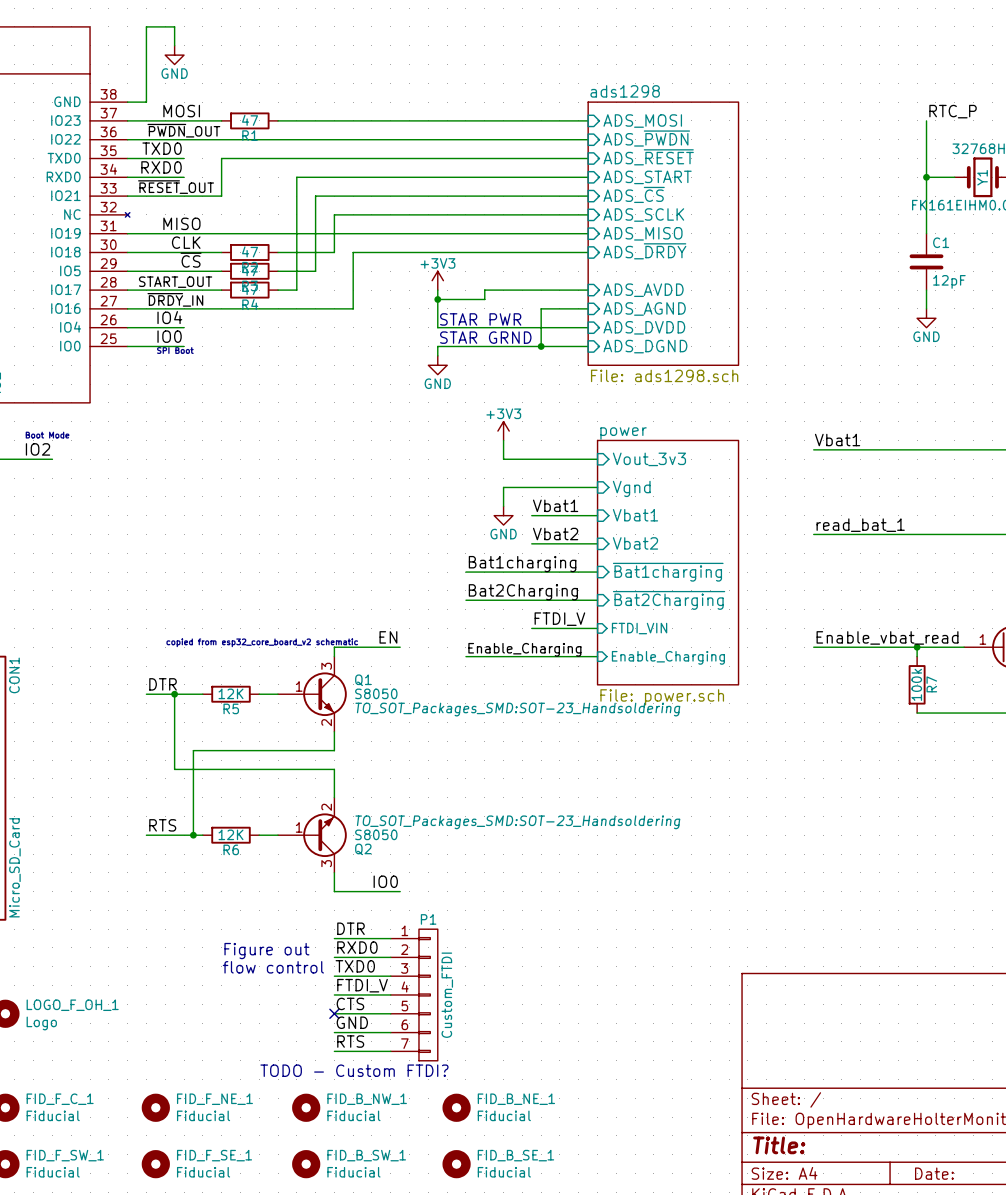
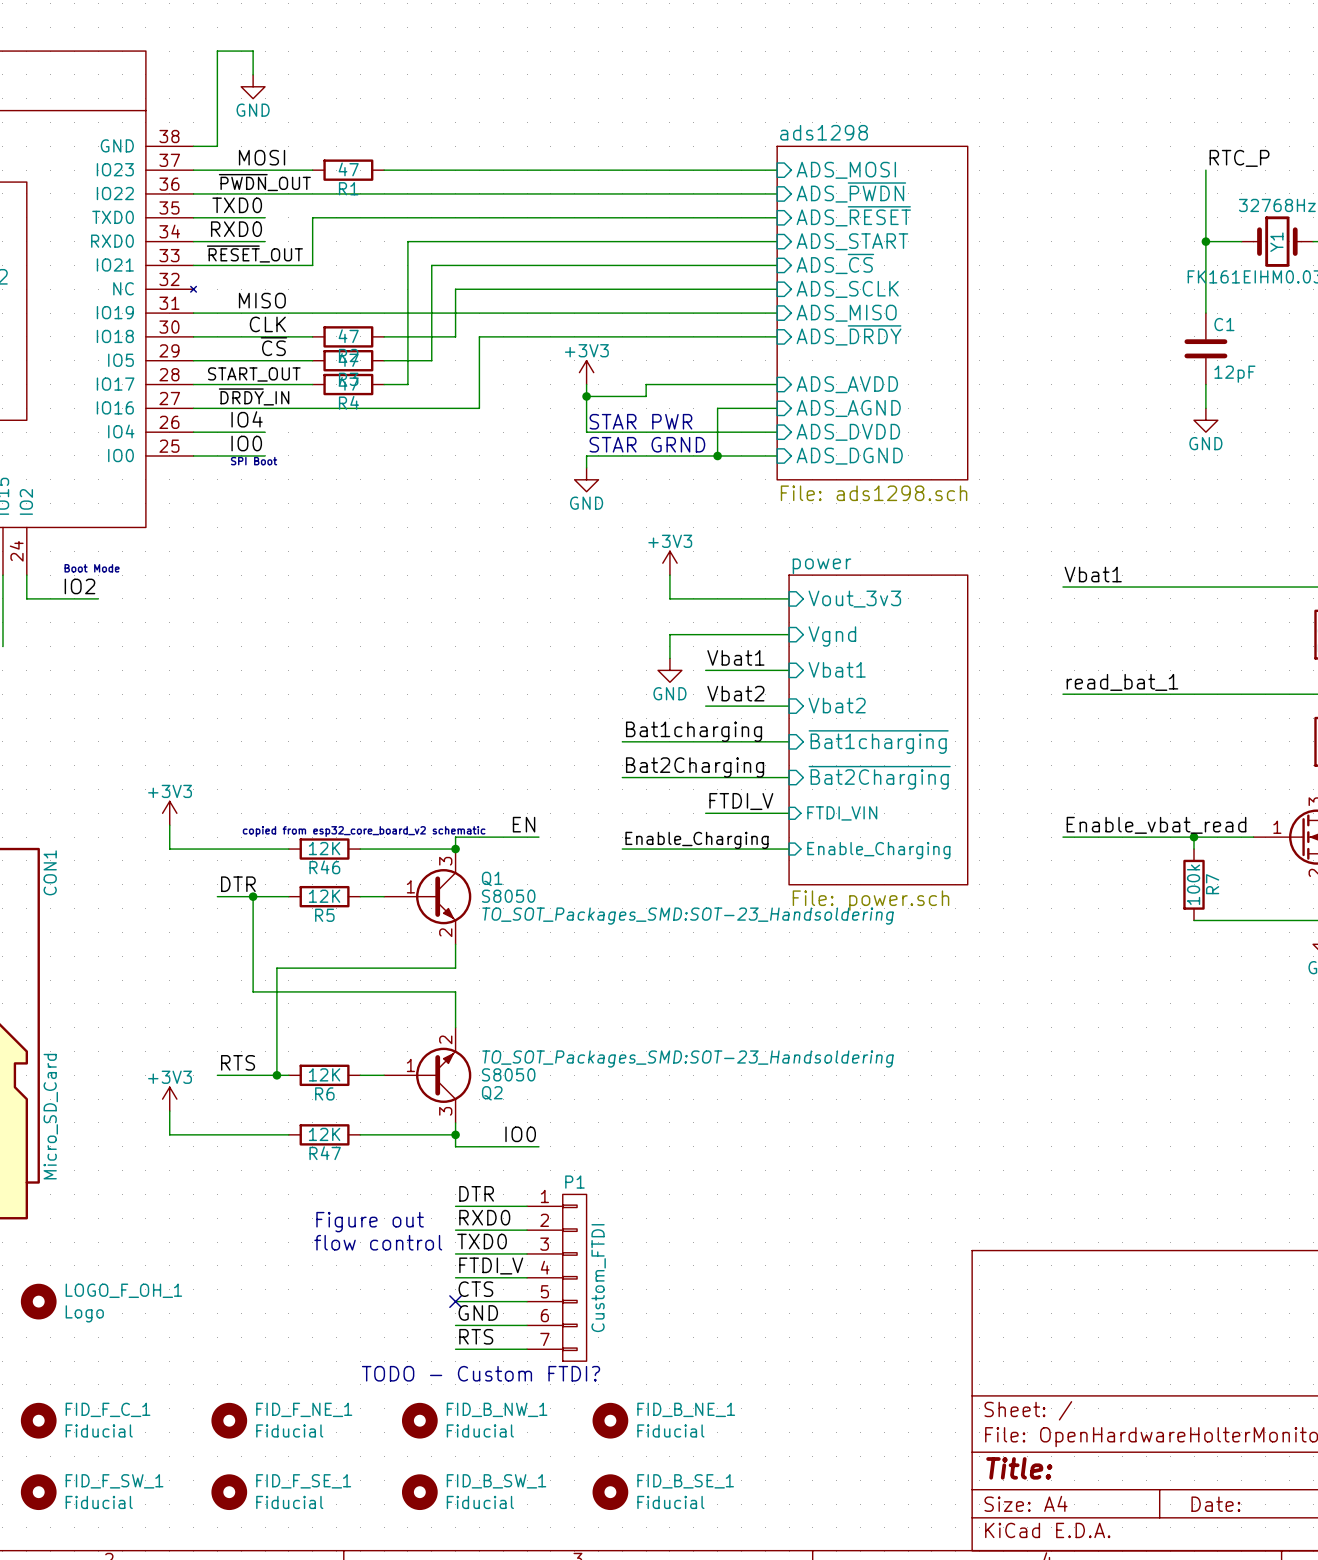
power symbol: none -> +3V3 (169, 813)
wire: none -> (169, 825) (169, 849) (288, 849)
R46: none -> 12K (324, 849)
wire: none -> (360, 849) (455, 849)
junction: none -> (455, 849)
power symbol: none -> +3V3 (169, 1099)
wire: none -> (169, 1111) (169, 1134) (288, 1134)
R47: none -> 12K (324, 1134)
wire: none -> (360, 1134) (455, 1134)
junction: none -> (455, 1134)

